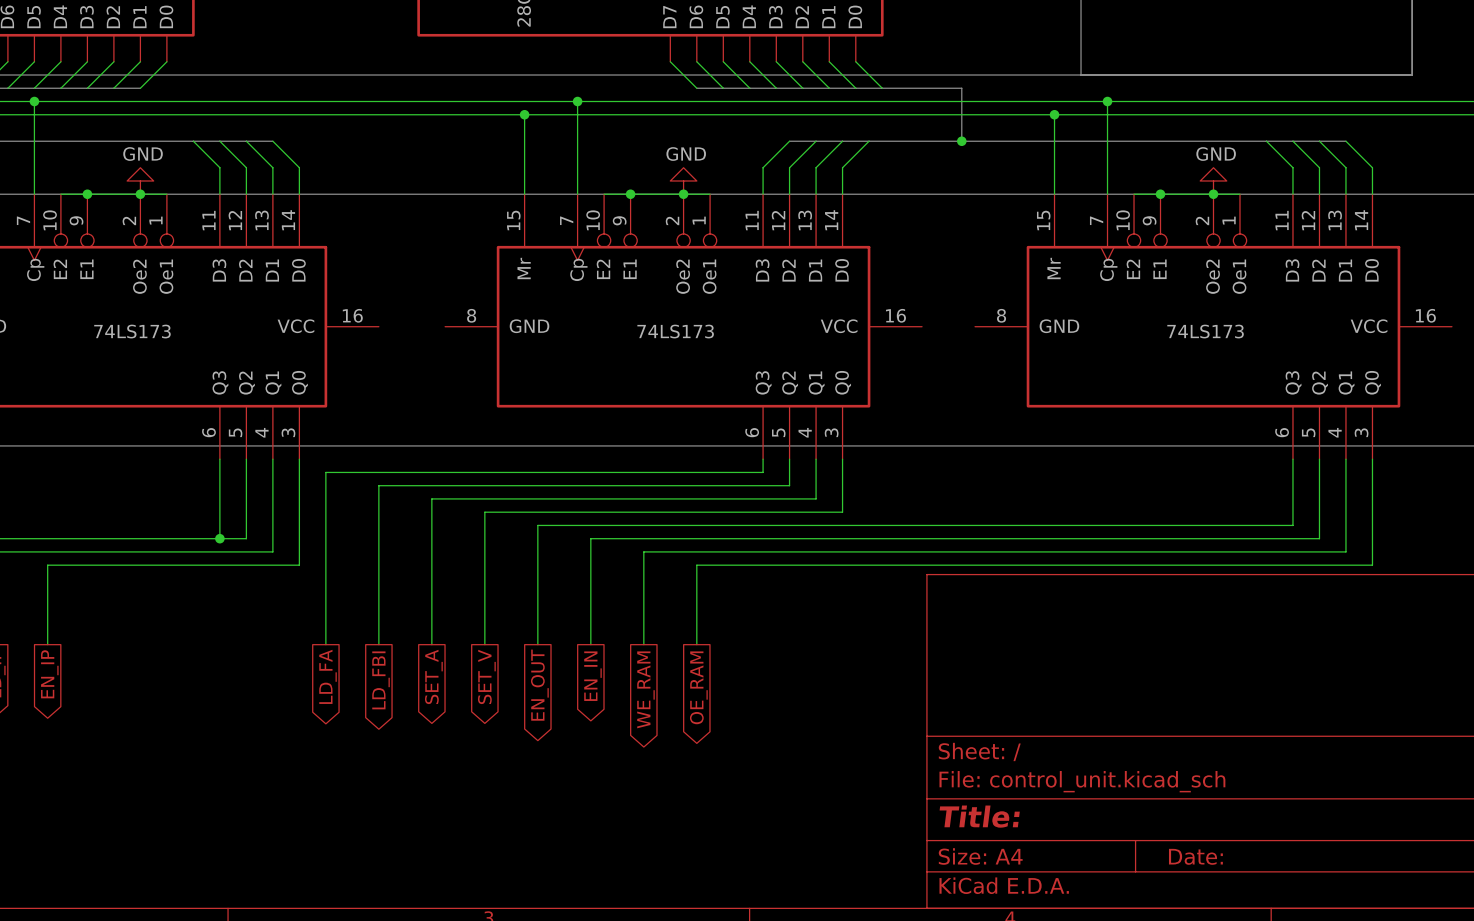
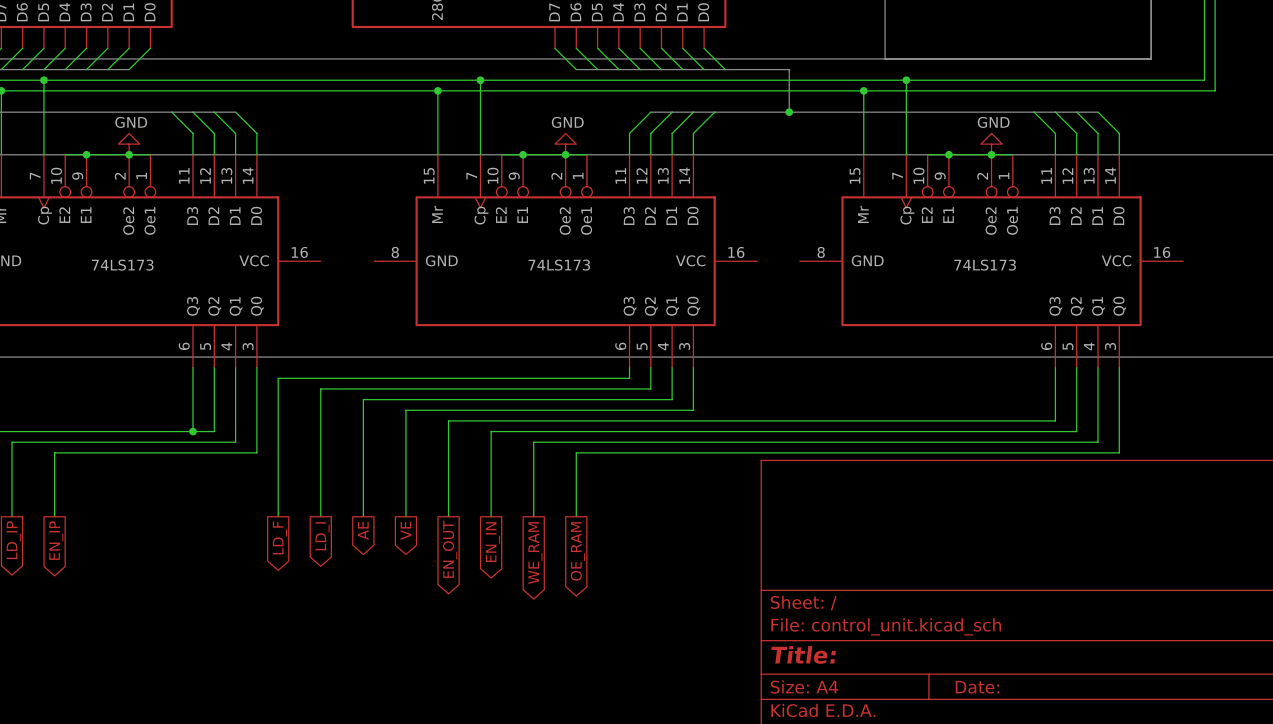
global label: LD_FA (328, 676) -> LD_F (279, 538)
global label: SET_A (433, 676) -> AE (363, 530)
global label: SET_V (486, 676) -> VE (405, 530)
global label: LD_FBI (381, 680) -> LD_I (322, 536)

